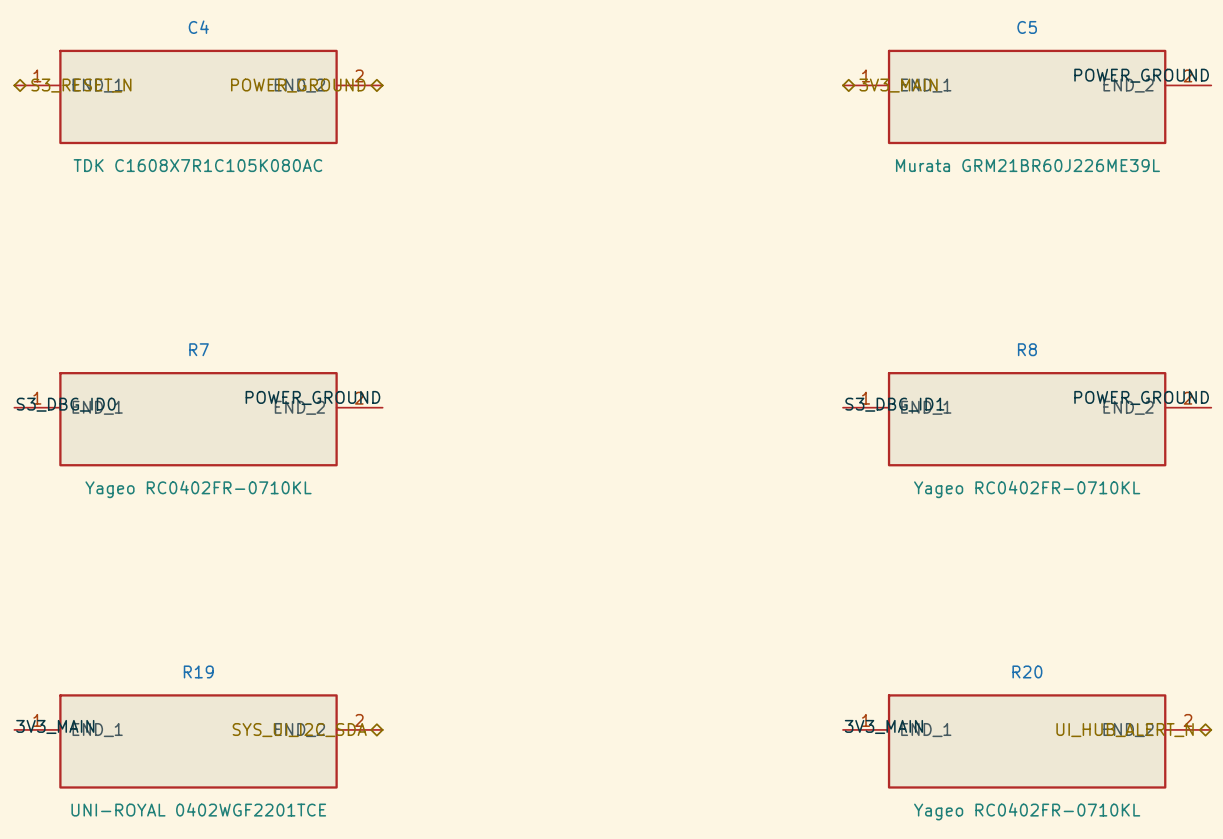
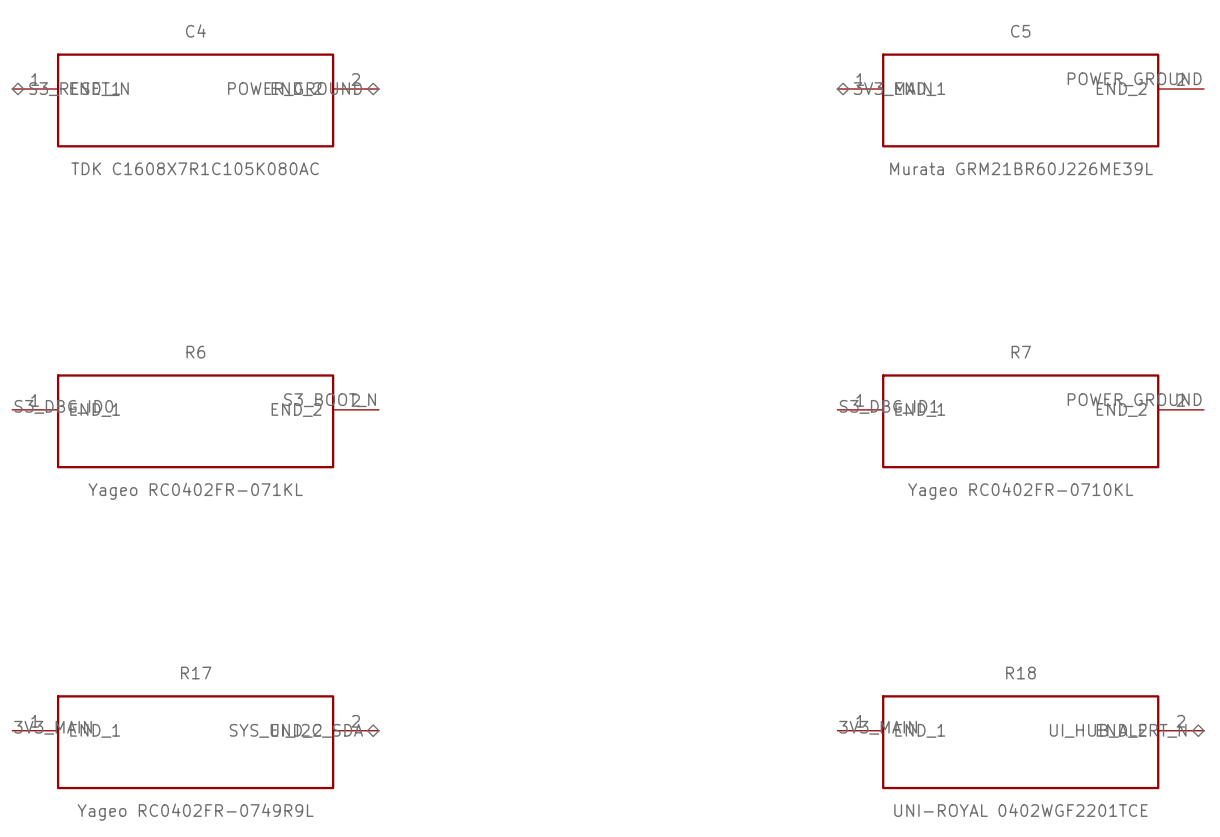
R7 name: R7 (199, 349) -> R6 (195, 352)
R8 name: R8 (1027, 349) -> R7 (1021, 352)
label: POWER_GROUND (312, 397) -> S3_BOOT_N (330, 400)
R7 value: Yageo RC0402FR-0710KL (198, 489) -> Yageo RC0402FR-071KL (195, 491)
R19 name: R19 (198, 671) -> R17 (196, 673)
R20 name: R20 (1027, 671) -> R18 (1020, 673)
R19 value: UNI-ROYAL 0402WGF2201TCE (198, 809) -> Yageo RC0402FR-0749R9L (195, 812)
R20 value: Yageo RC0402FR-0710KL (1027, 811) -> UNI-ROYAL 0402WGF2201TCE (1020, 810)

